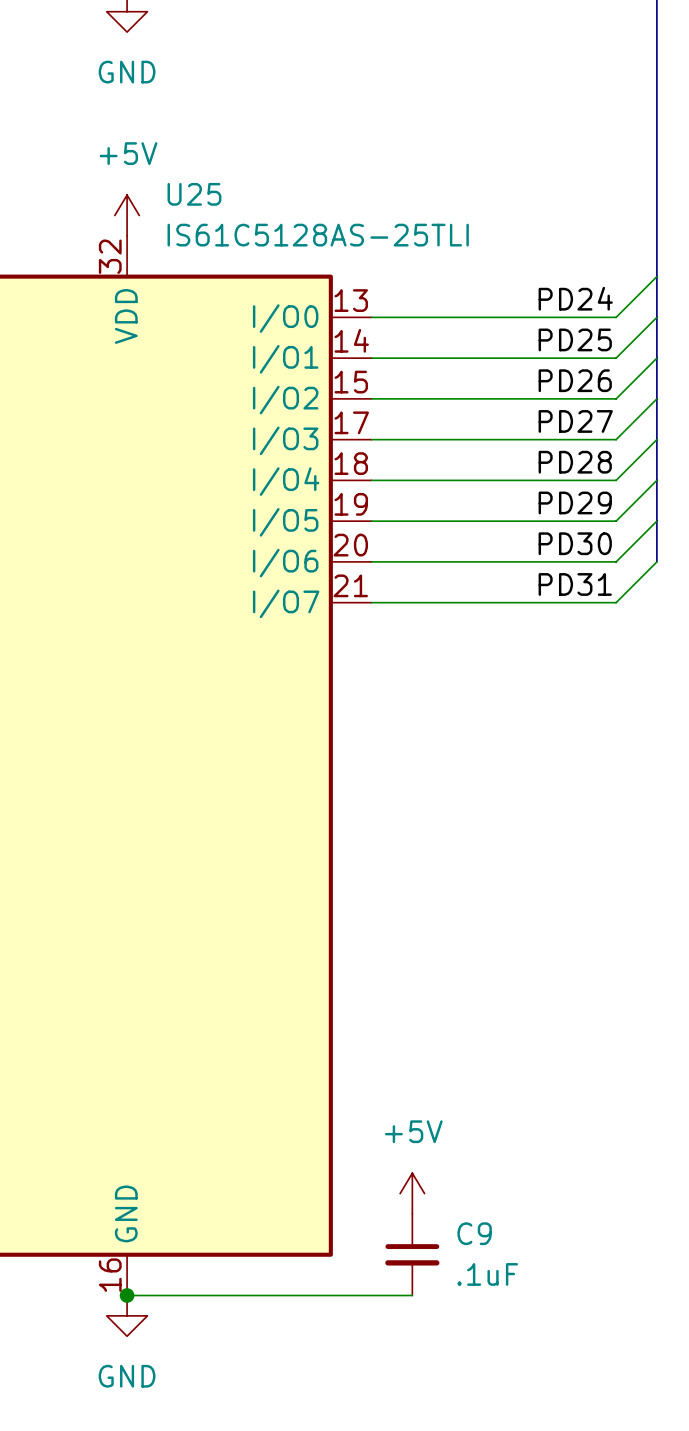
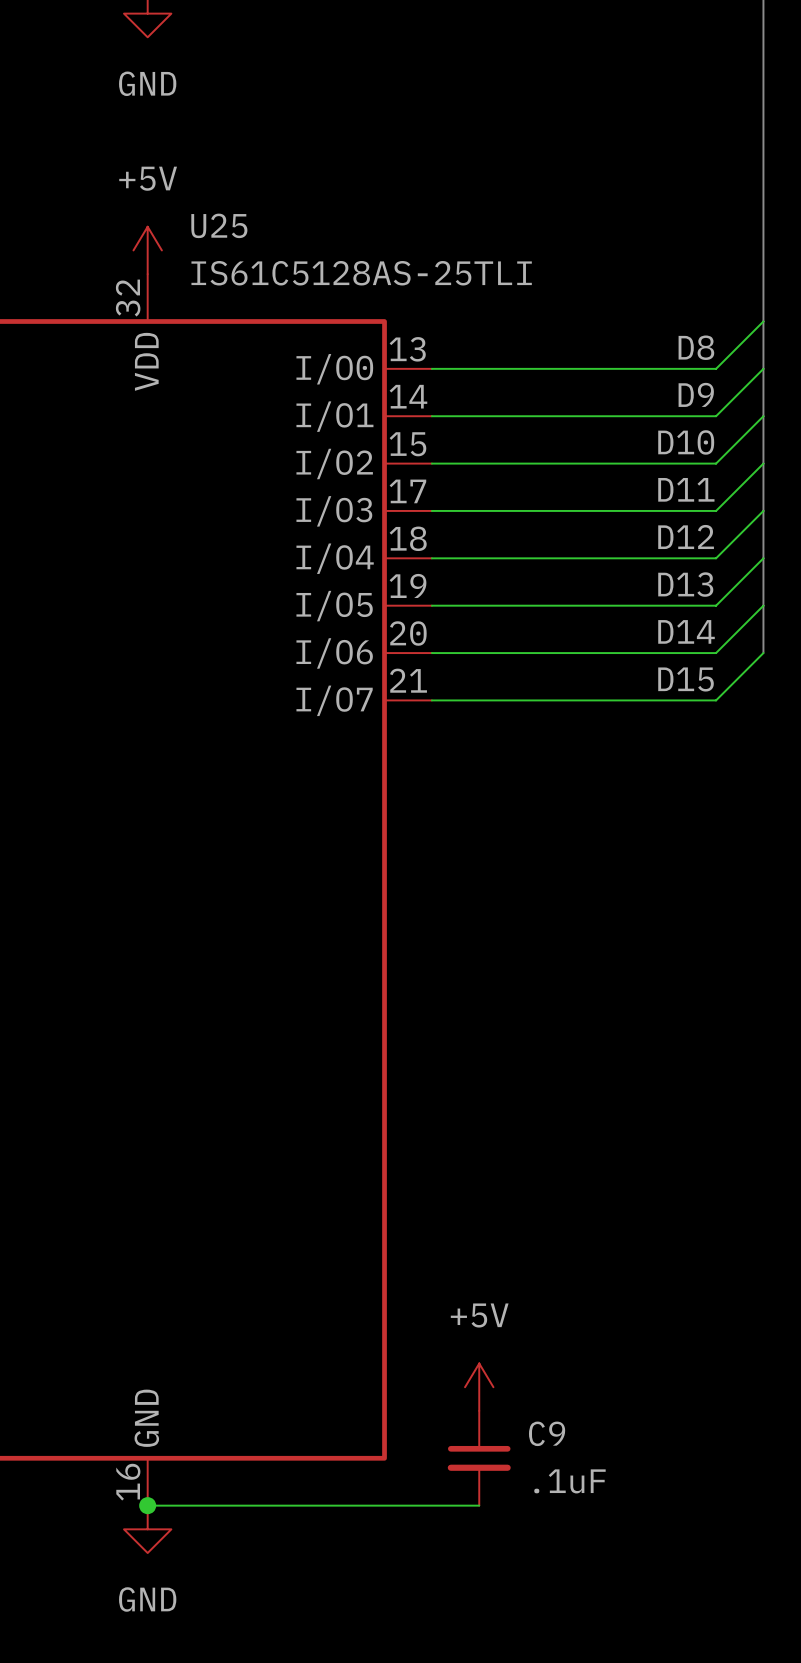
label: PD24 (575, 298) -> D8 (696, 347)
label: PD25 (575, 339) -> D9 (696, 394)
label: PD26 (575, 380) -> D10 (686, 442)
label: PD27 (575, 421) -> D11 (686, 489)
label: PD28 (575, 462) -> D12 (686, 536)
label: PD29 (575, 502) -> D13 (685, 584)
label: PD30 (575, 543) -> D14 (686, 631)
label: PD31 (575, 584) -> D15 (686, 679)

